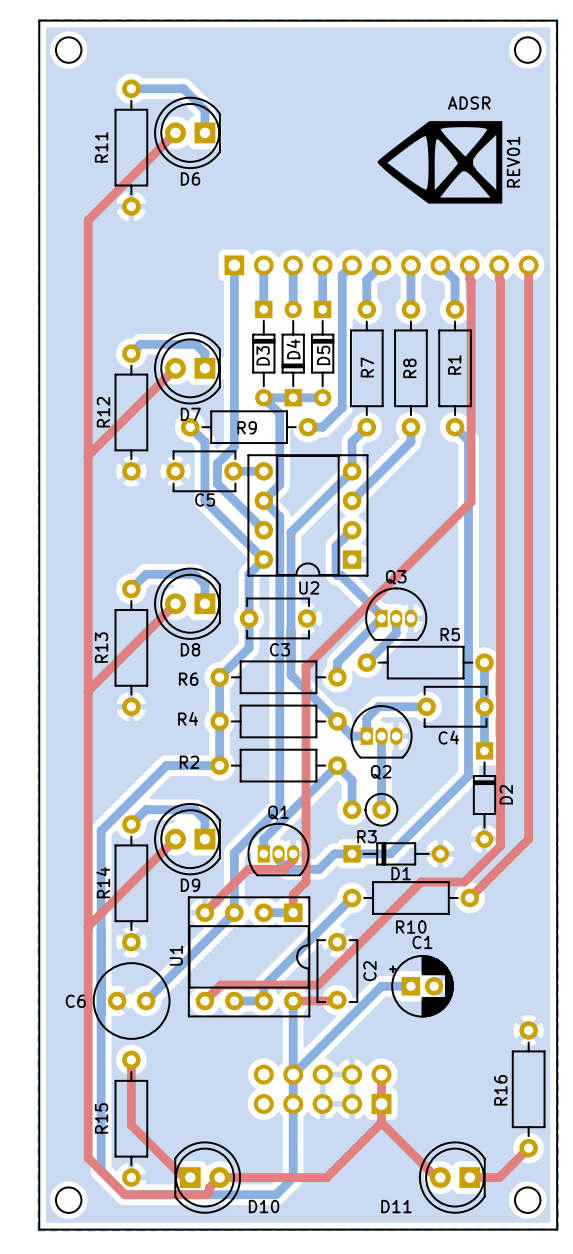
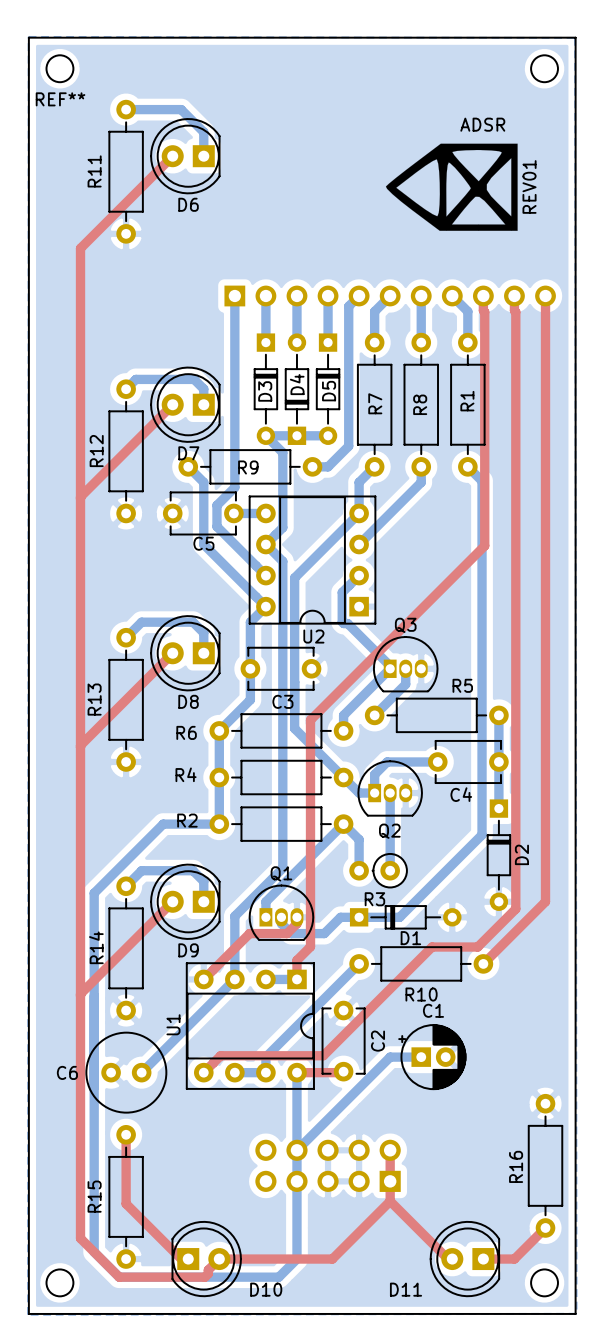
REF** name: none -> REF** (60, 99)

